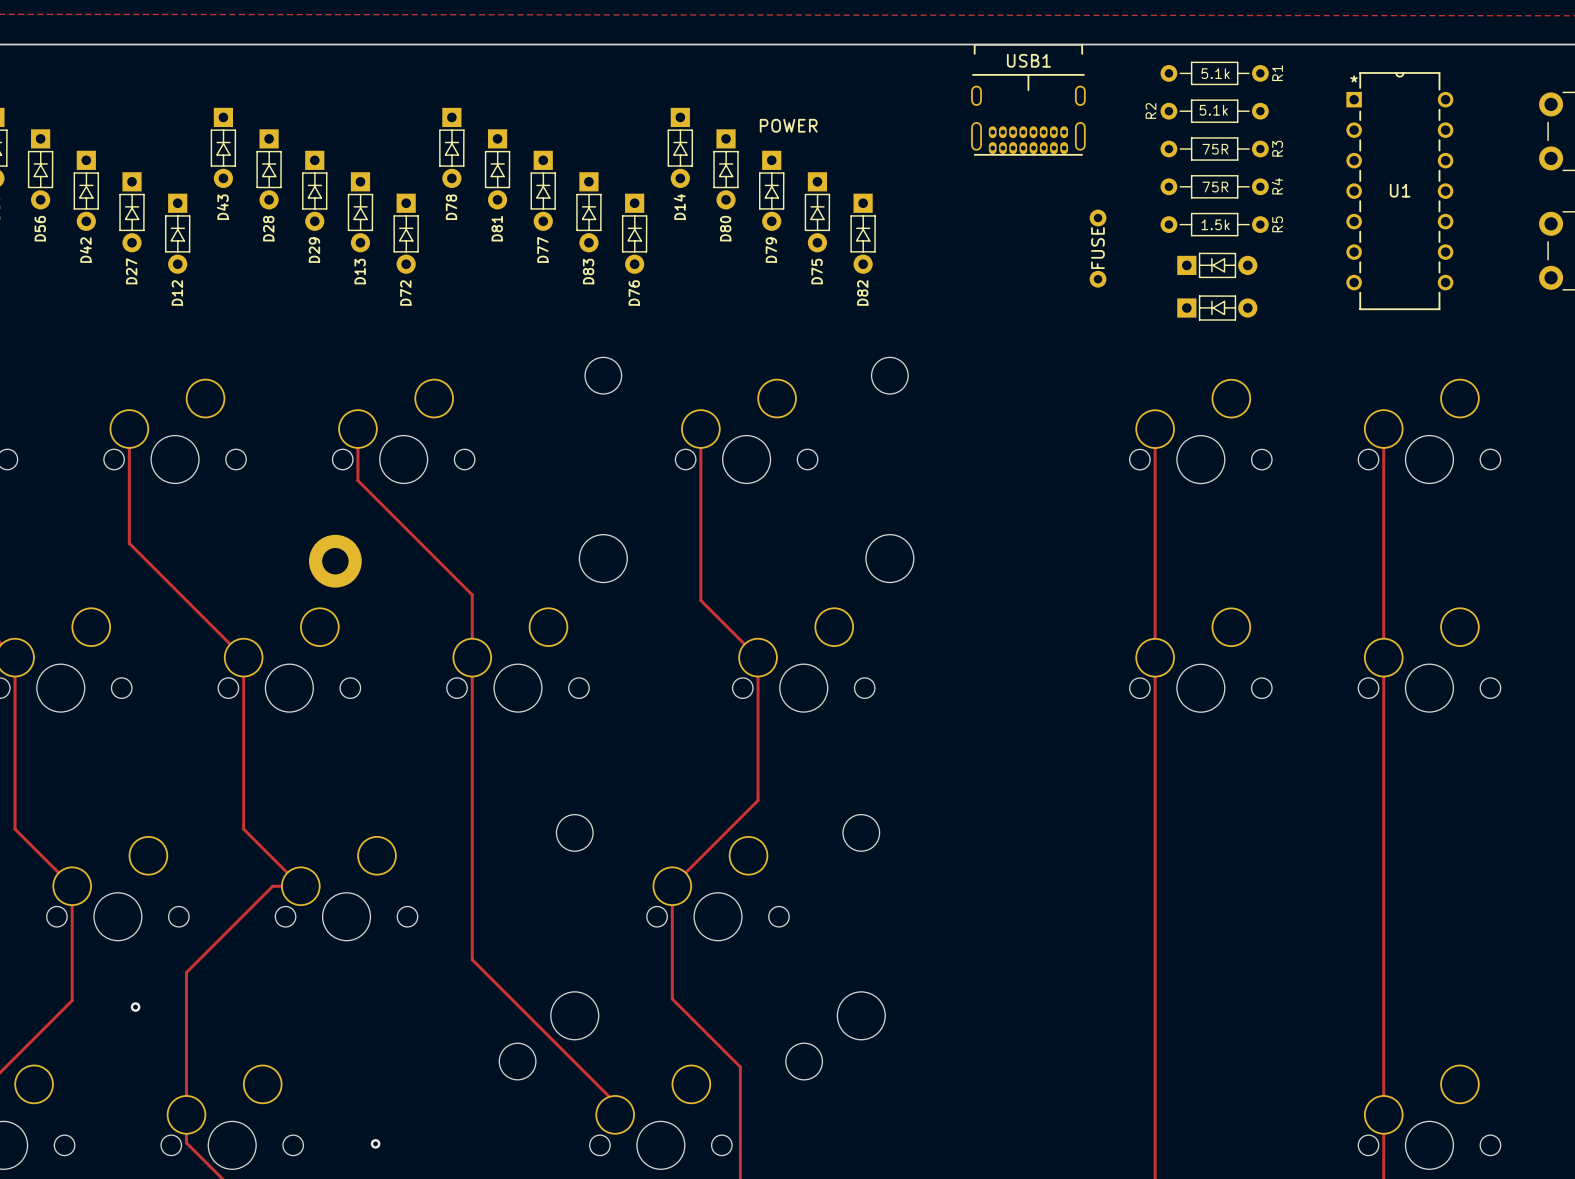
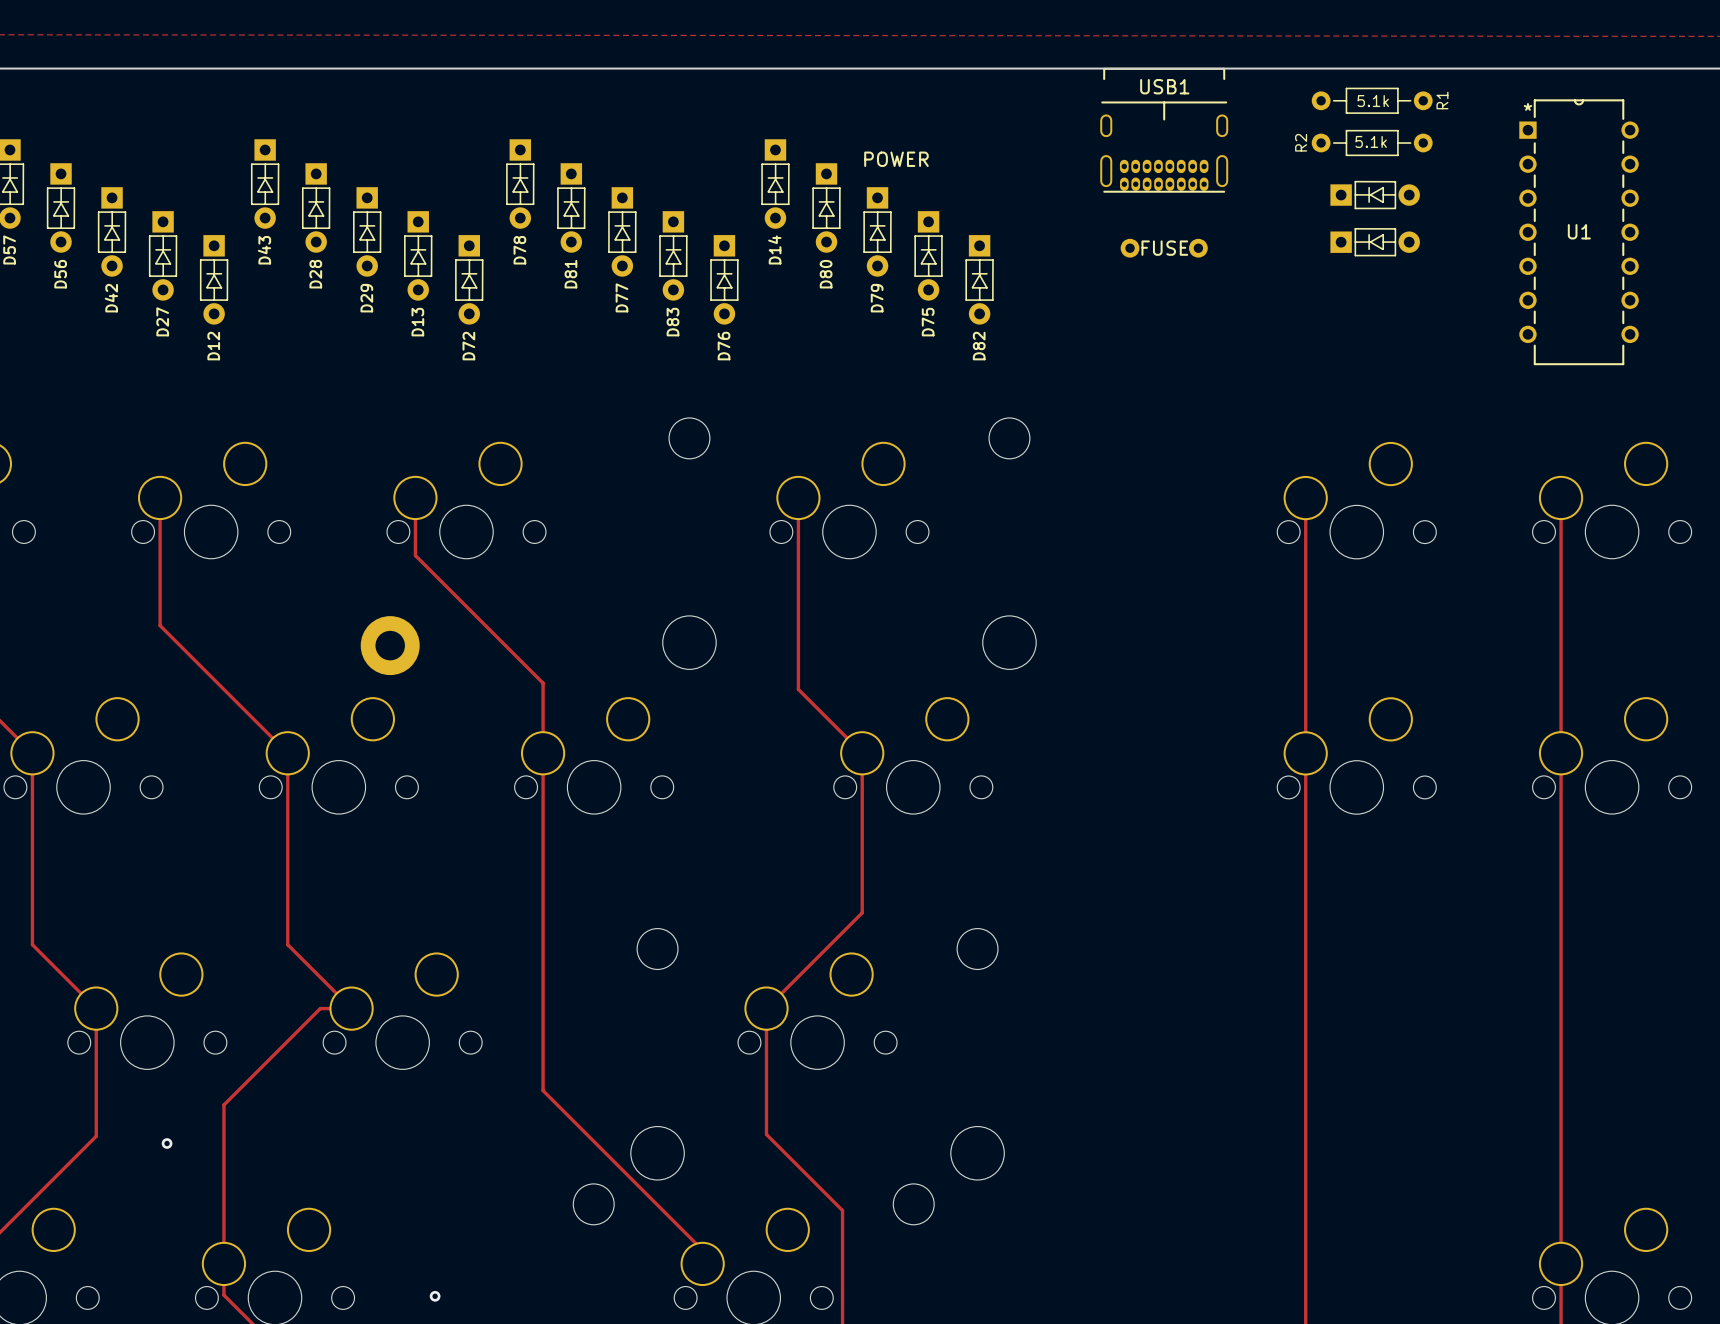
R3: 75R (1214, 148) -> none
part: none -> (1375, 195)
R4: 75R (1214, 186) -> none
part: none -> (1375, 242)
R5: 1.5k (1214, 224) -> none
part rotation: 0° (1098, 248) -> 90° clockwise (1164, 248)
part position: (1098, 248) -> (1164, 248)
part: (1217, 265) -> none
part: (1217, 308) -> none

